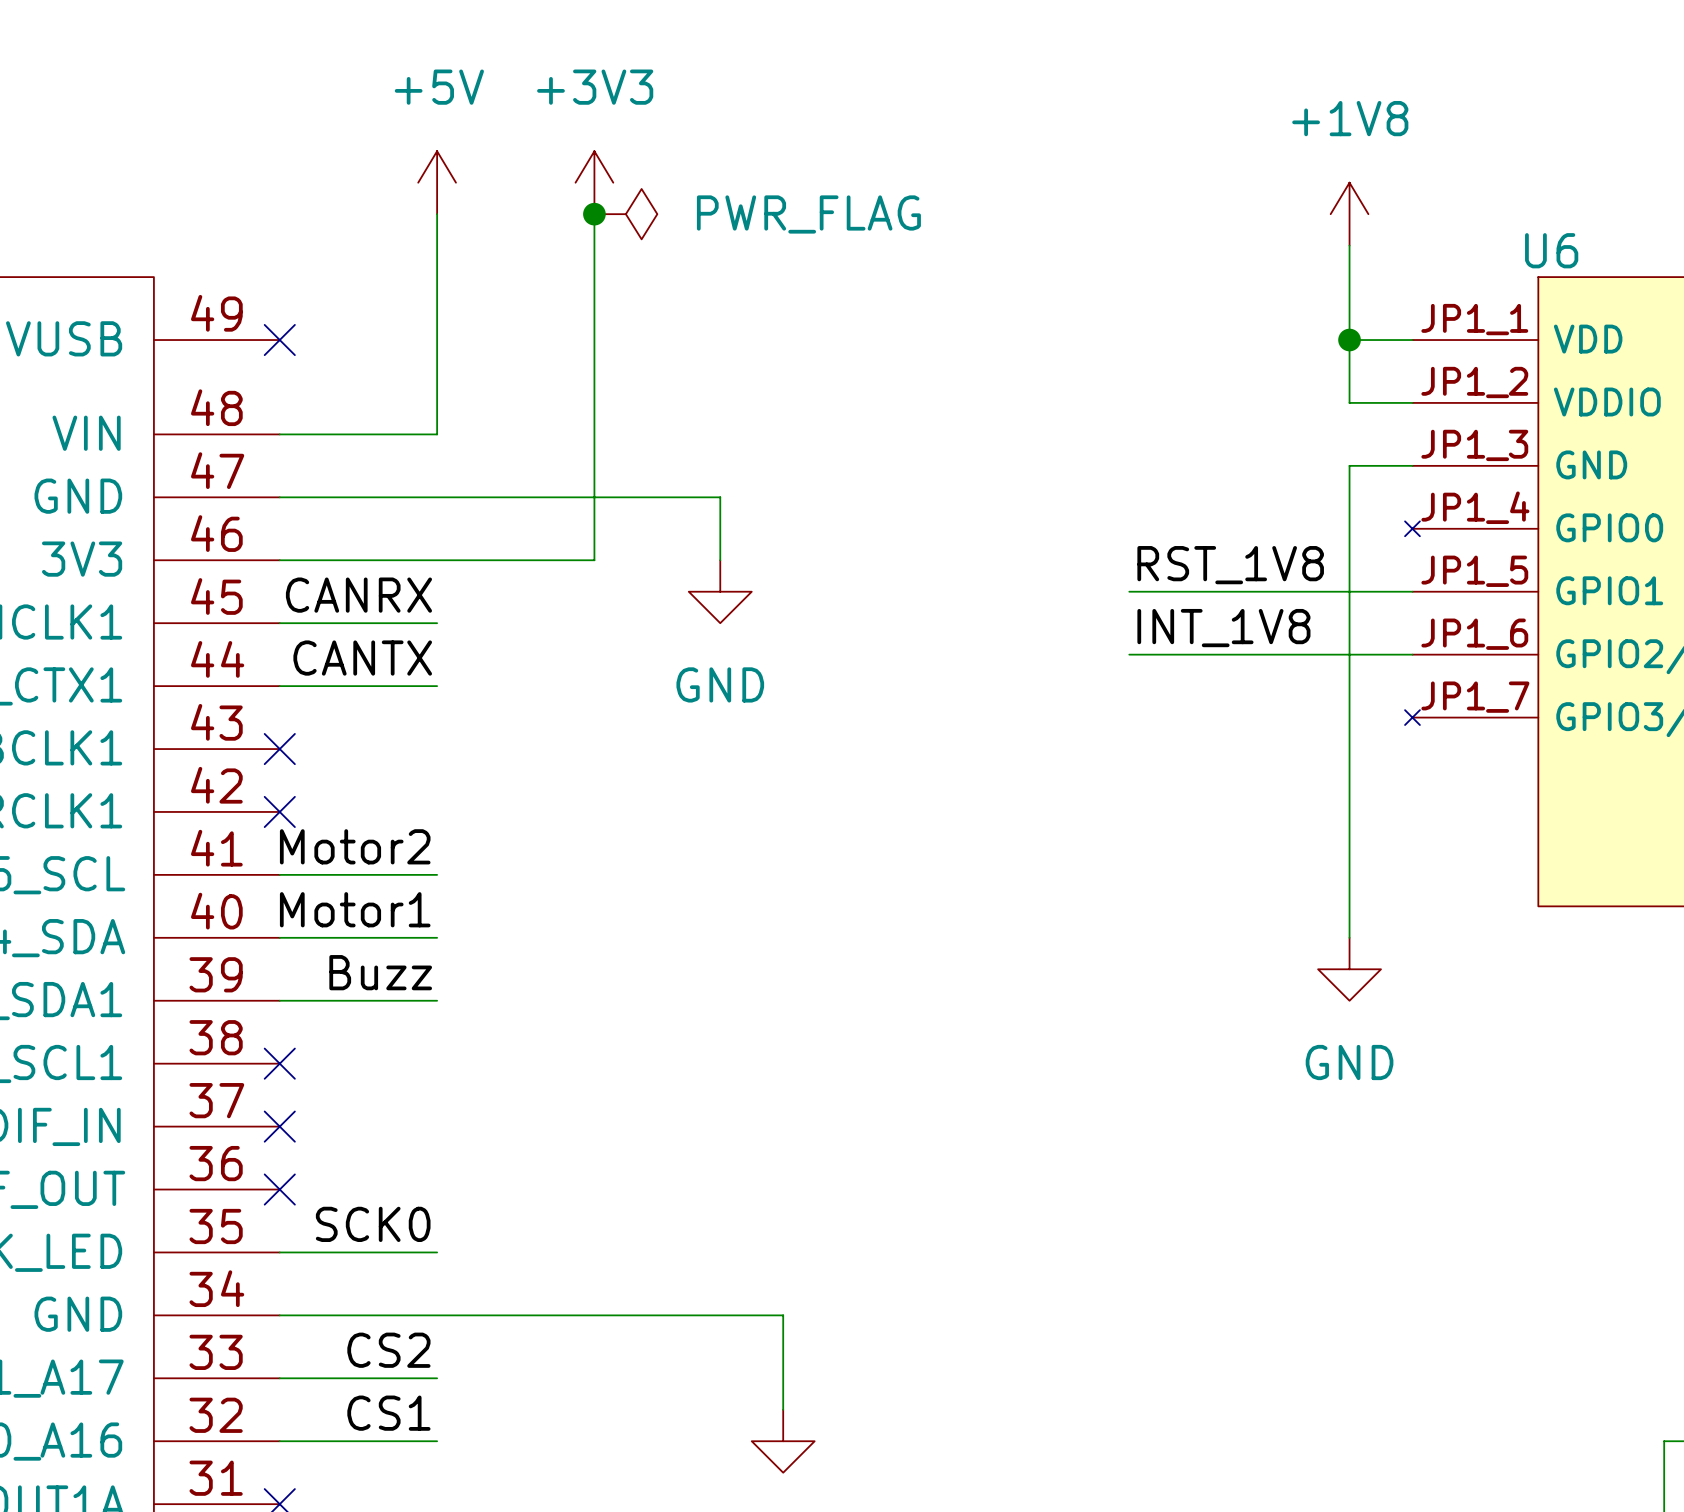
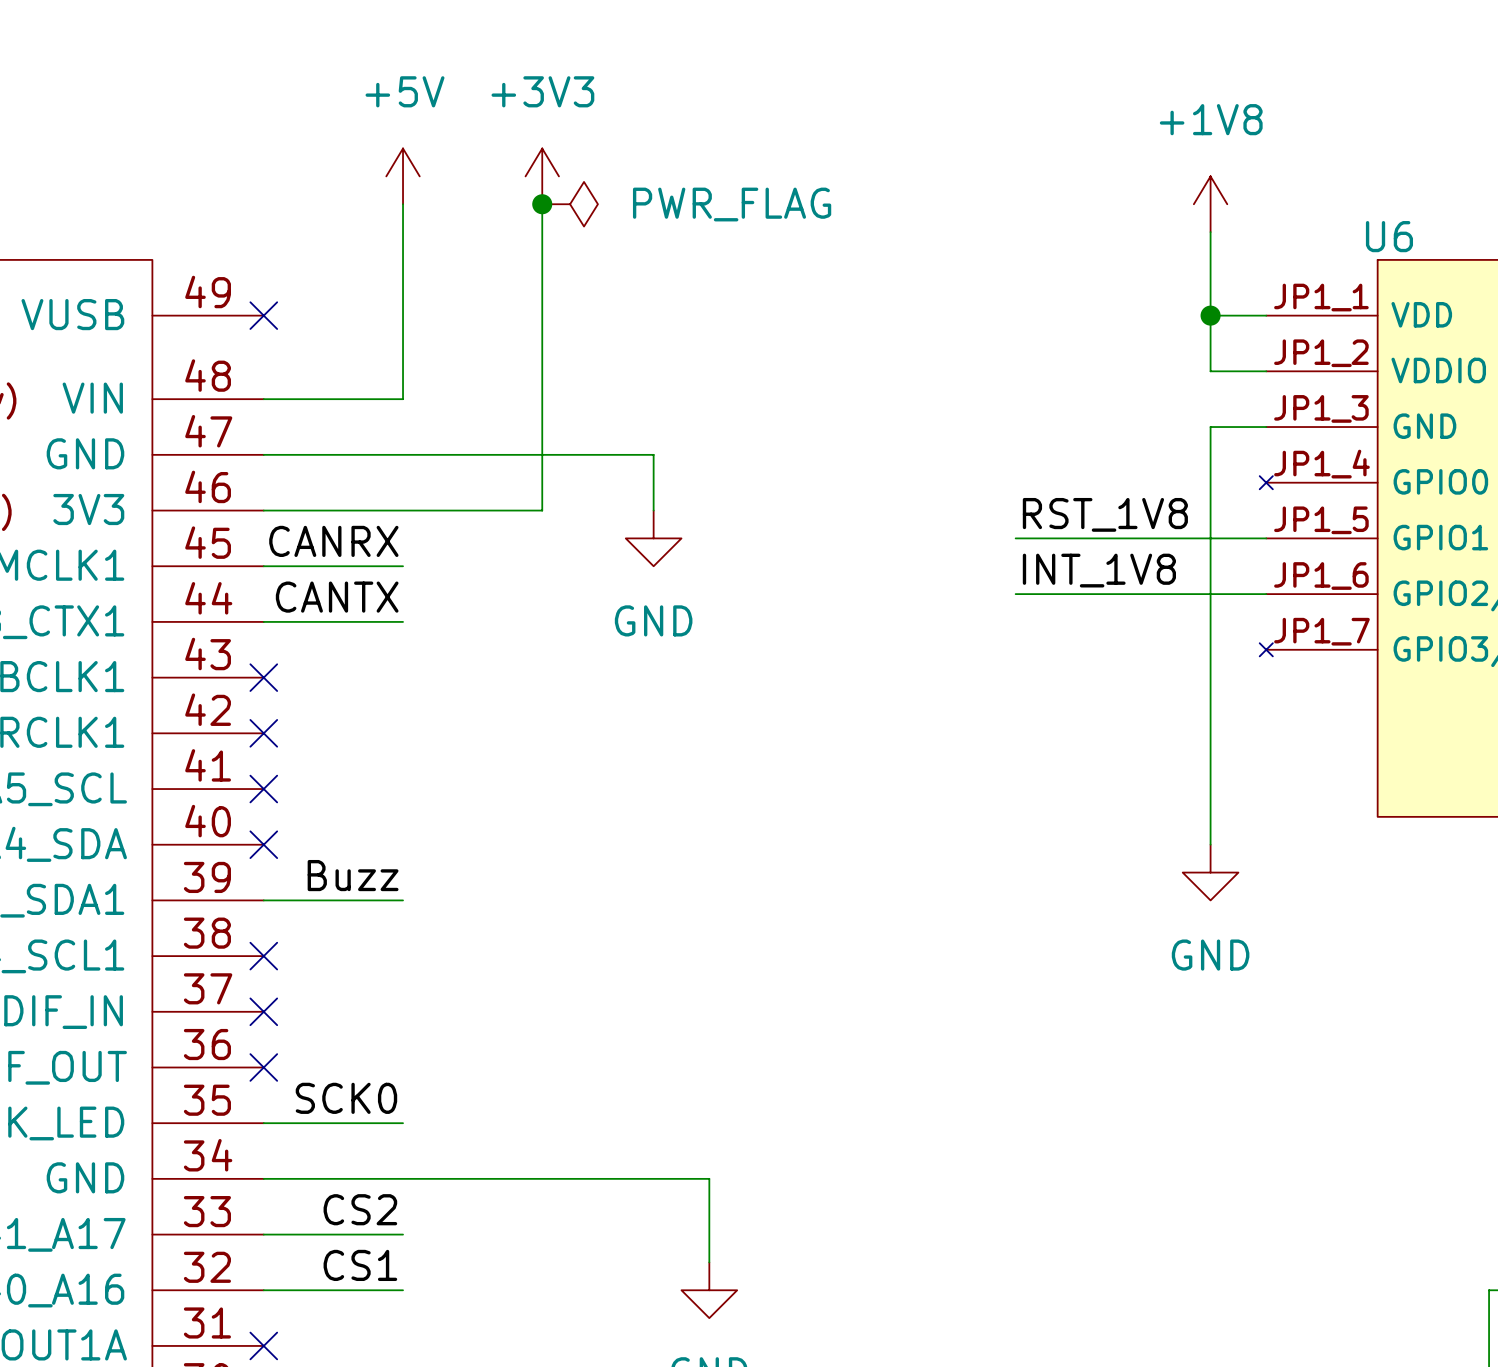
label: Motor2 (355, 846) -> none
wire: (279, 874) (437, 874) -> none
no-connect mark: none -> (263, 789)
label: Motor1 (355, 909) -> none
wire: (279, 937) (437, 937) -> none
no-connect mark: none -> (263, 844)

